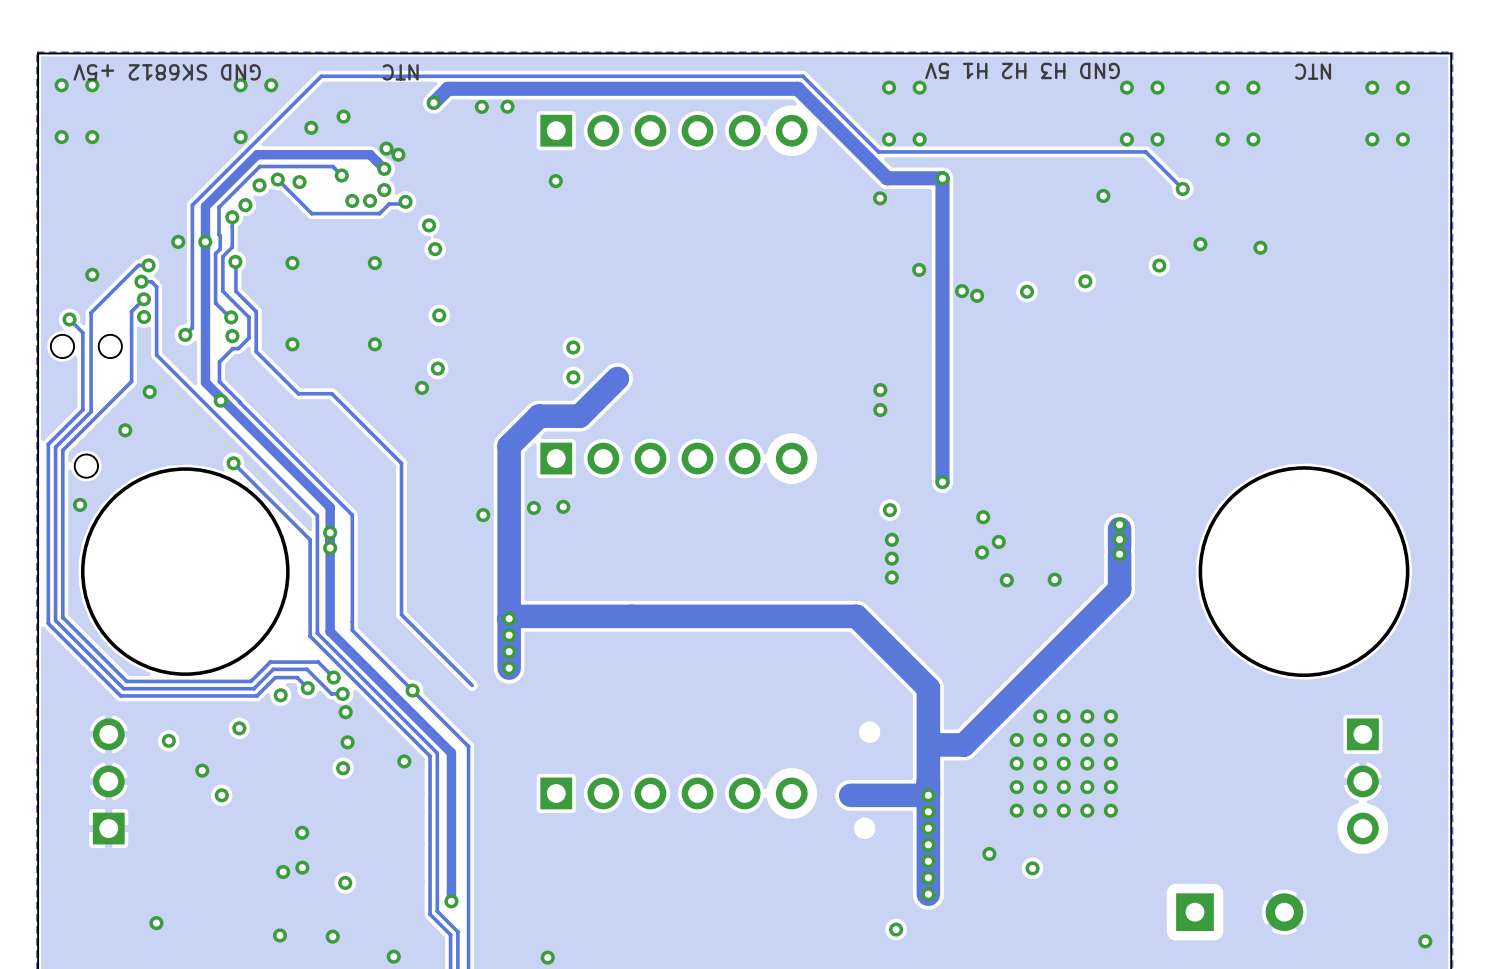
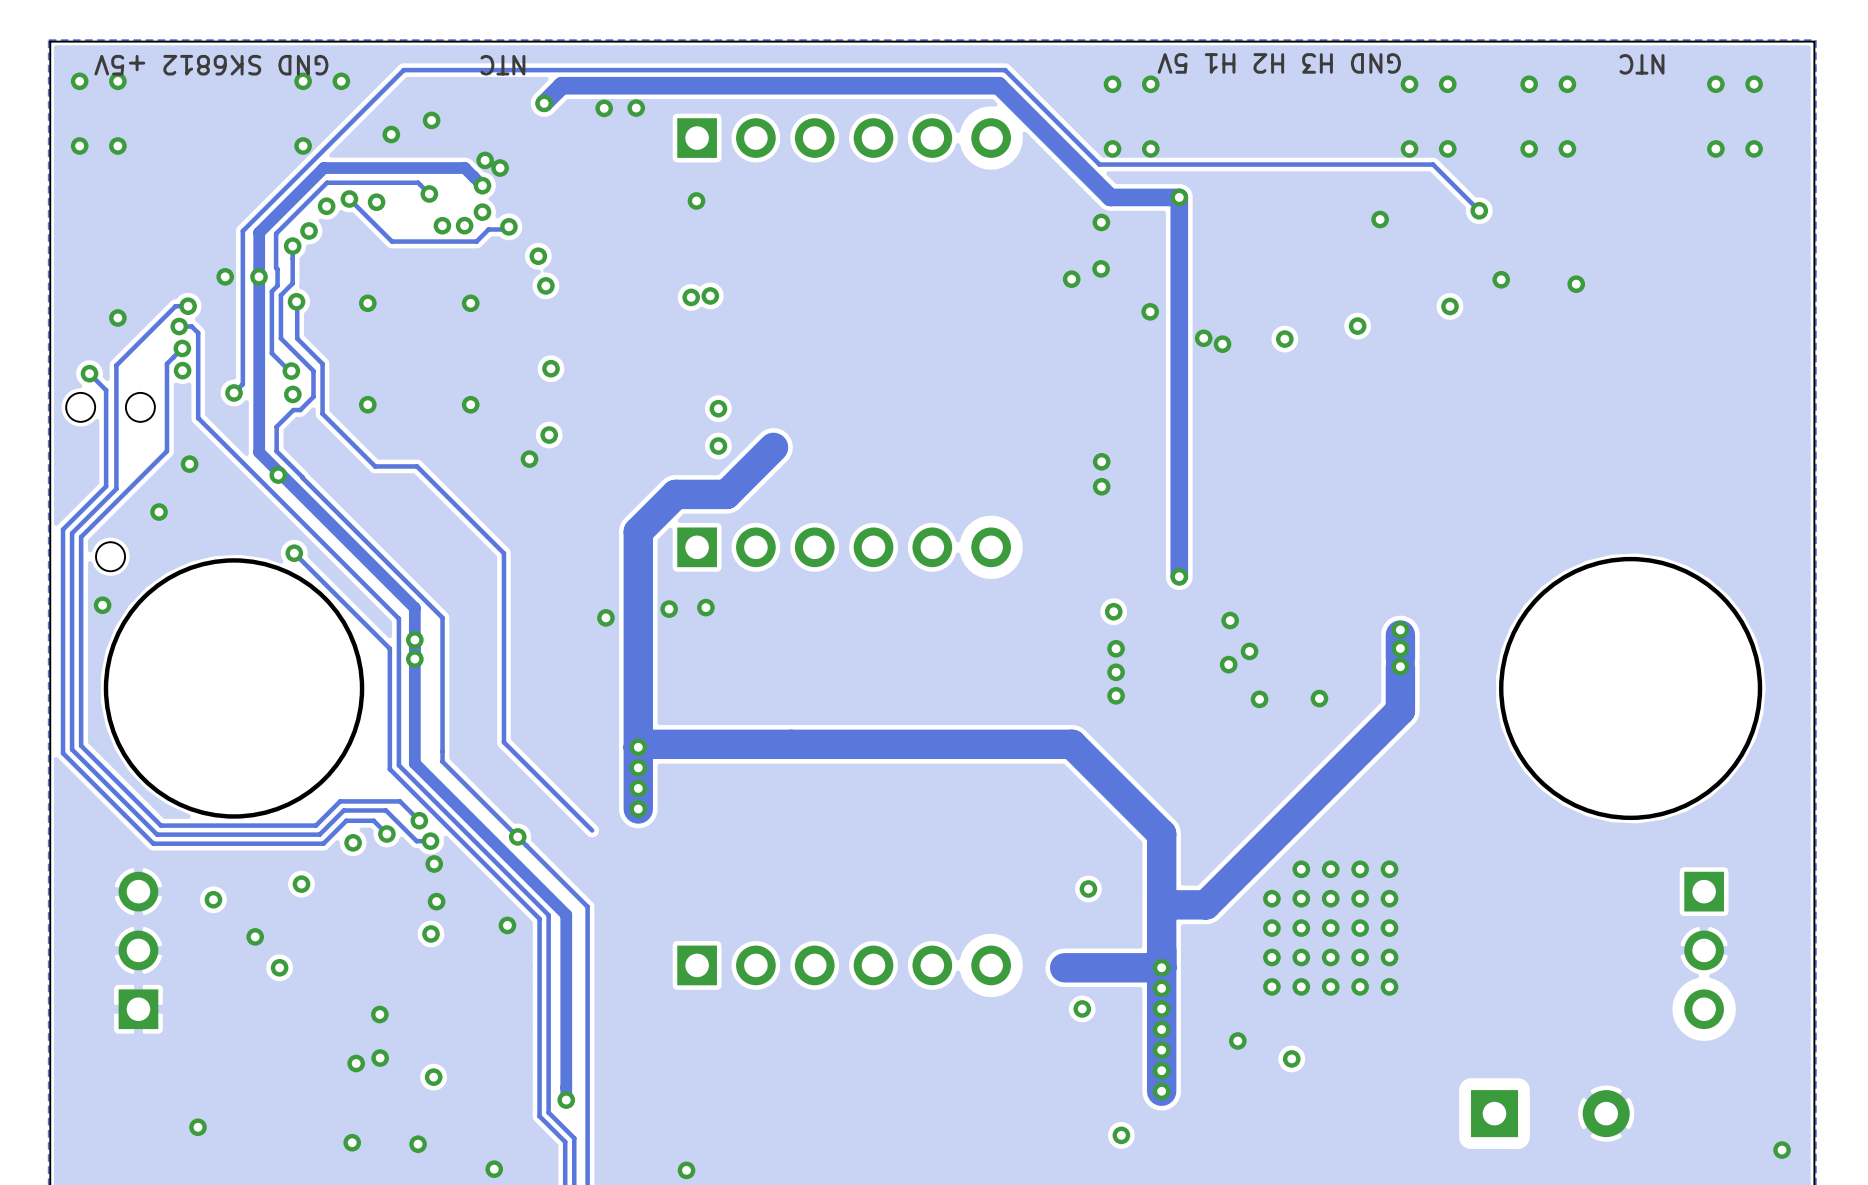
via: none -> (1101, 268)
via: none -> (1071, 279)
via: none -> (710, 295)
via: none -> (691, 297)
via: none -> (1088, 888)
via: none -> (1082, 1008)

